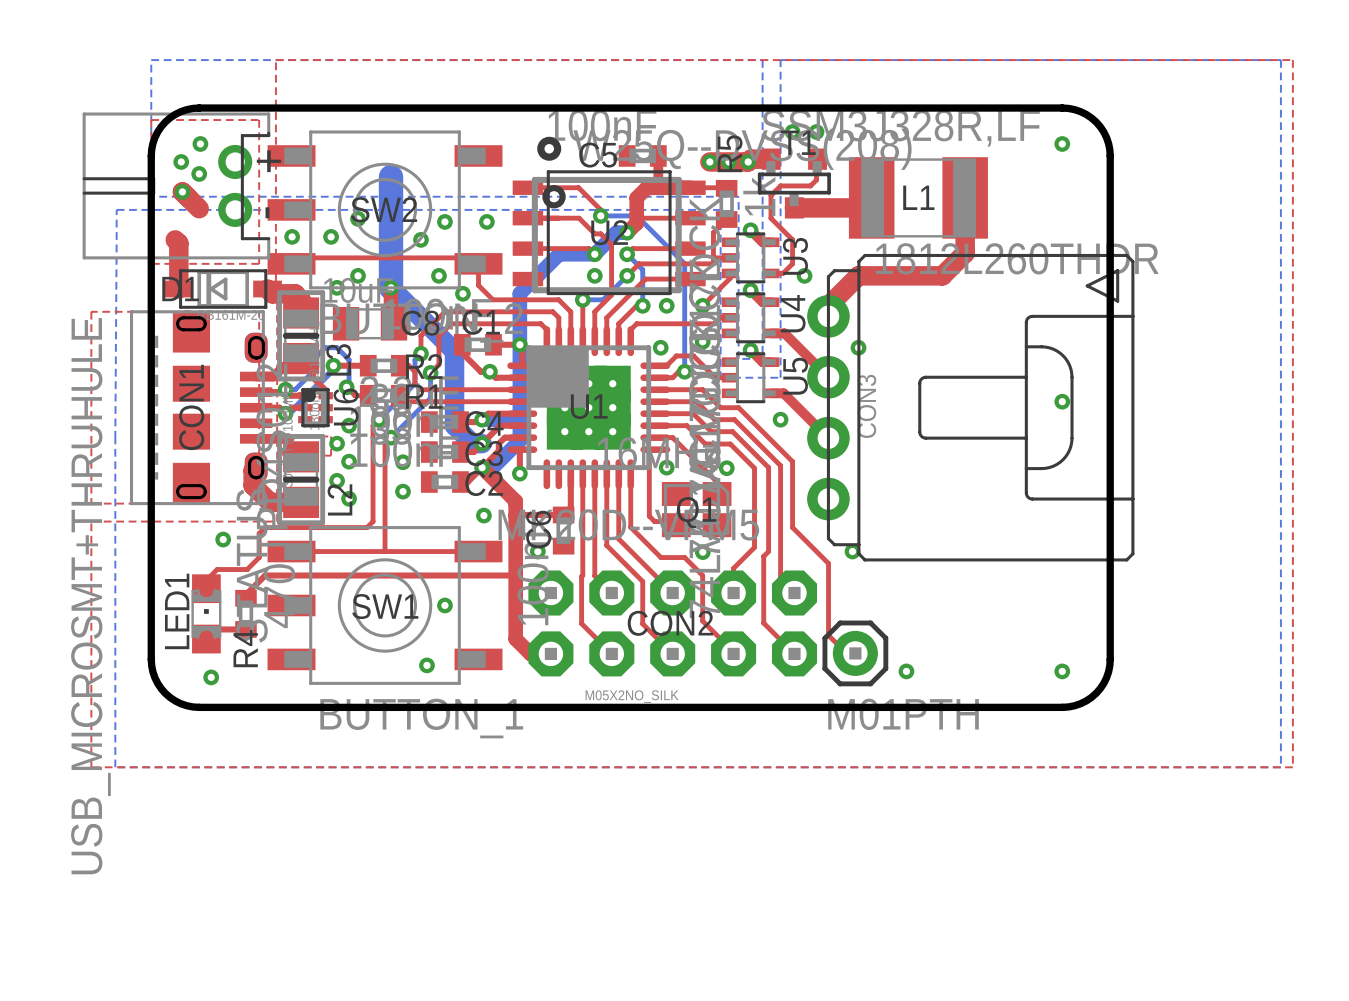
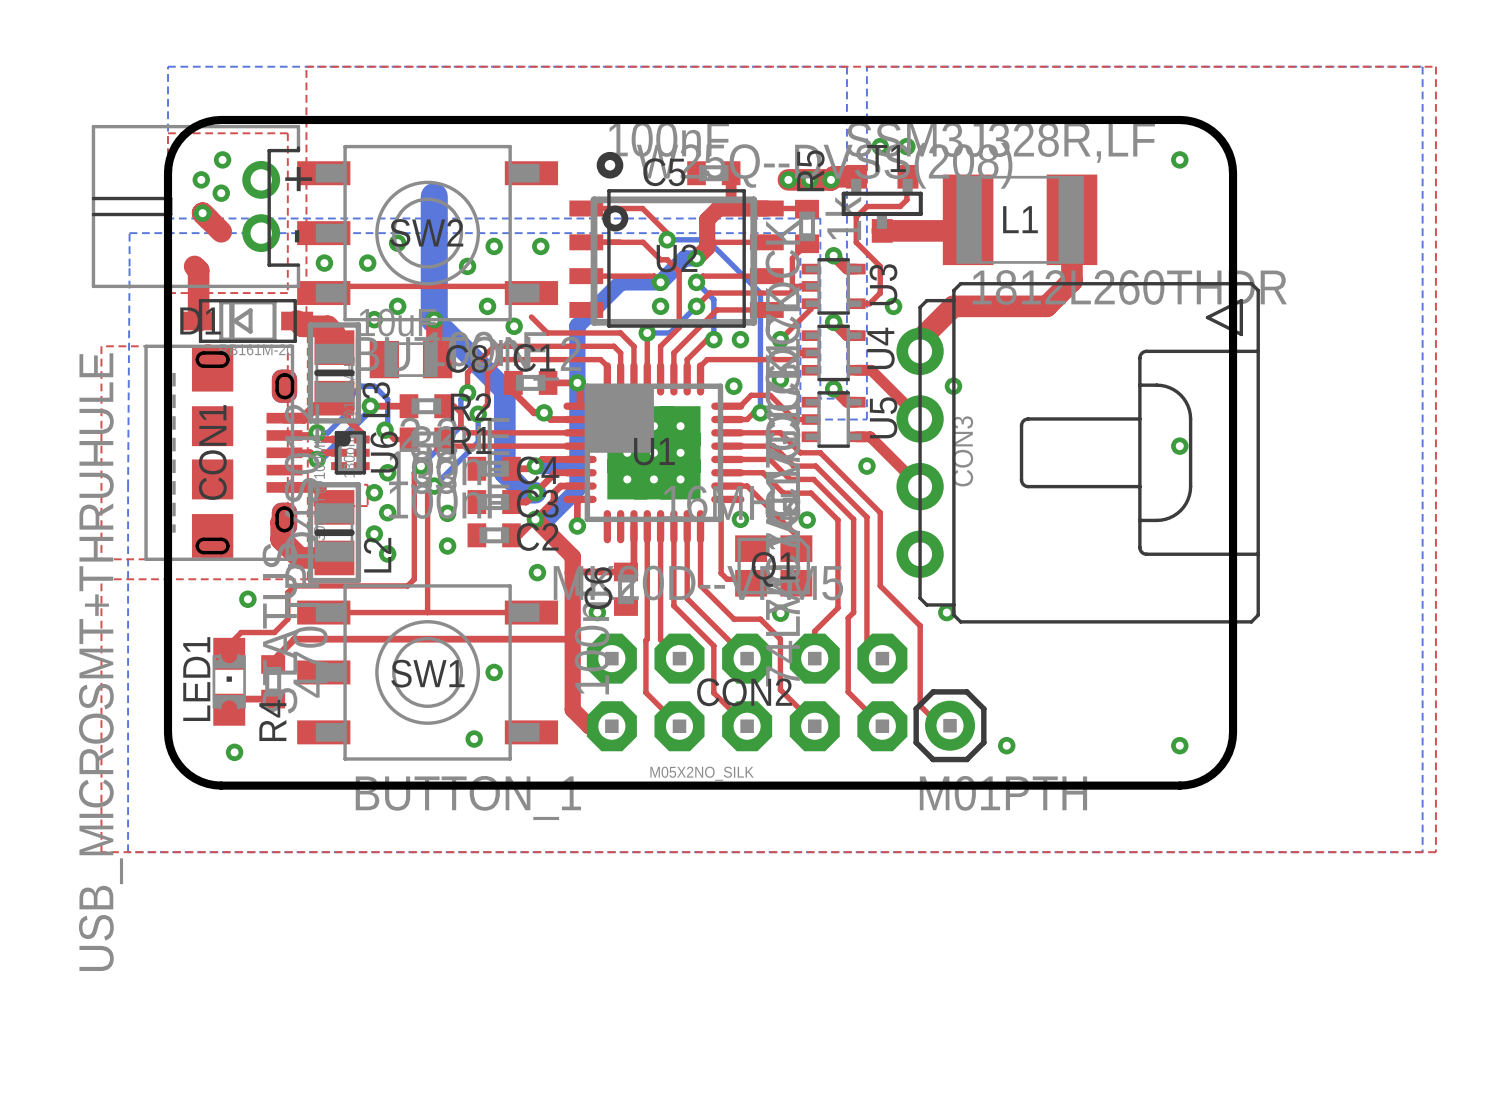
top track: (478, 263) (478, 285) -> none

